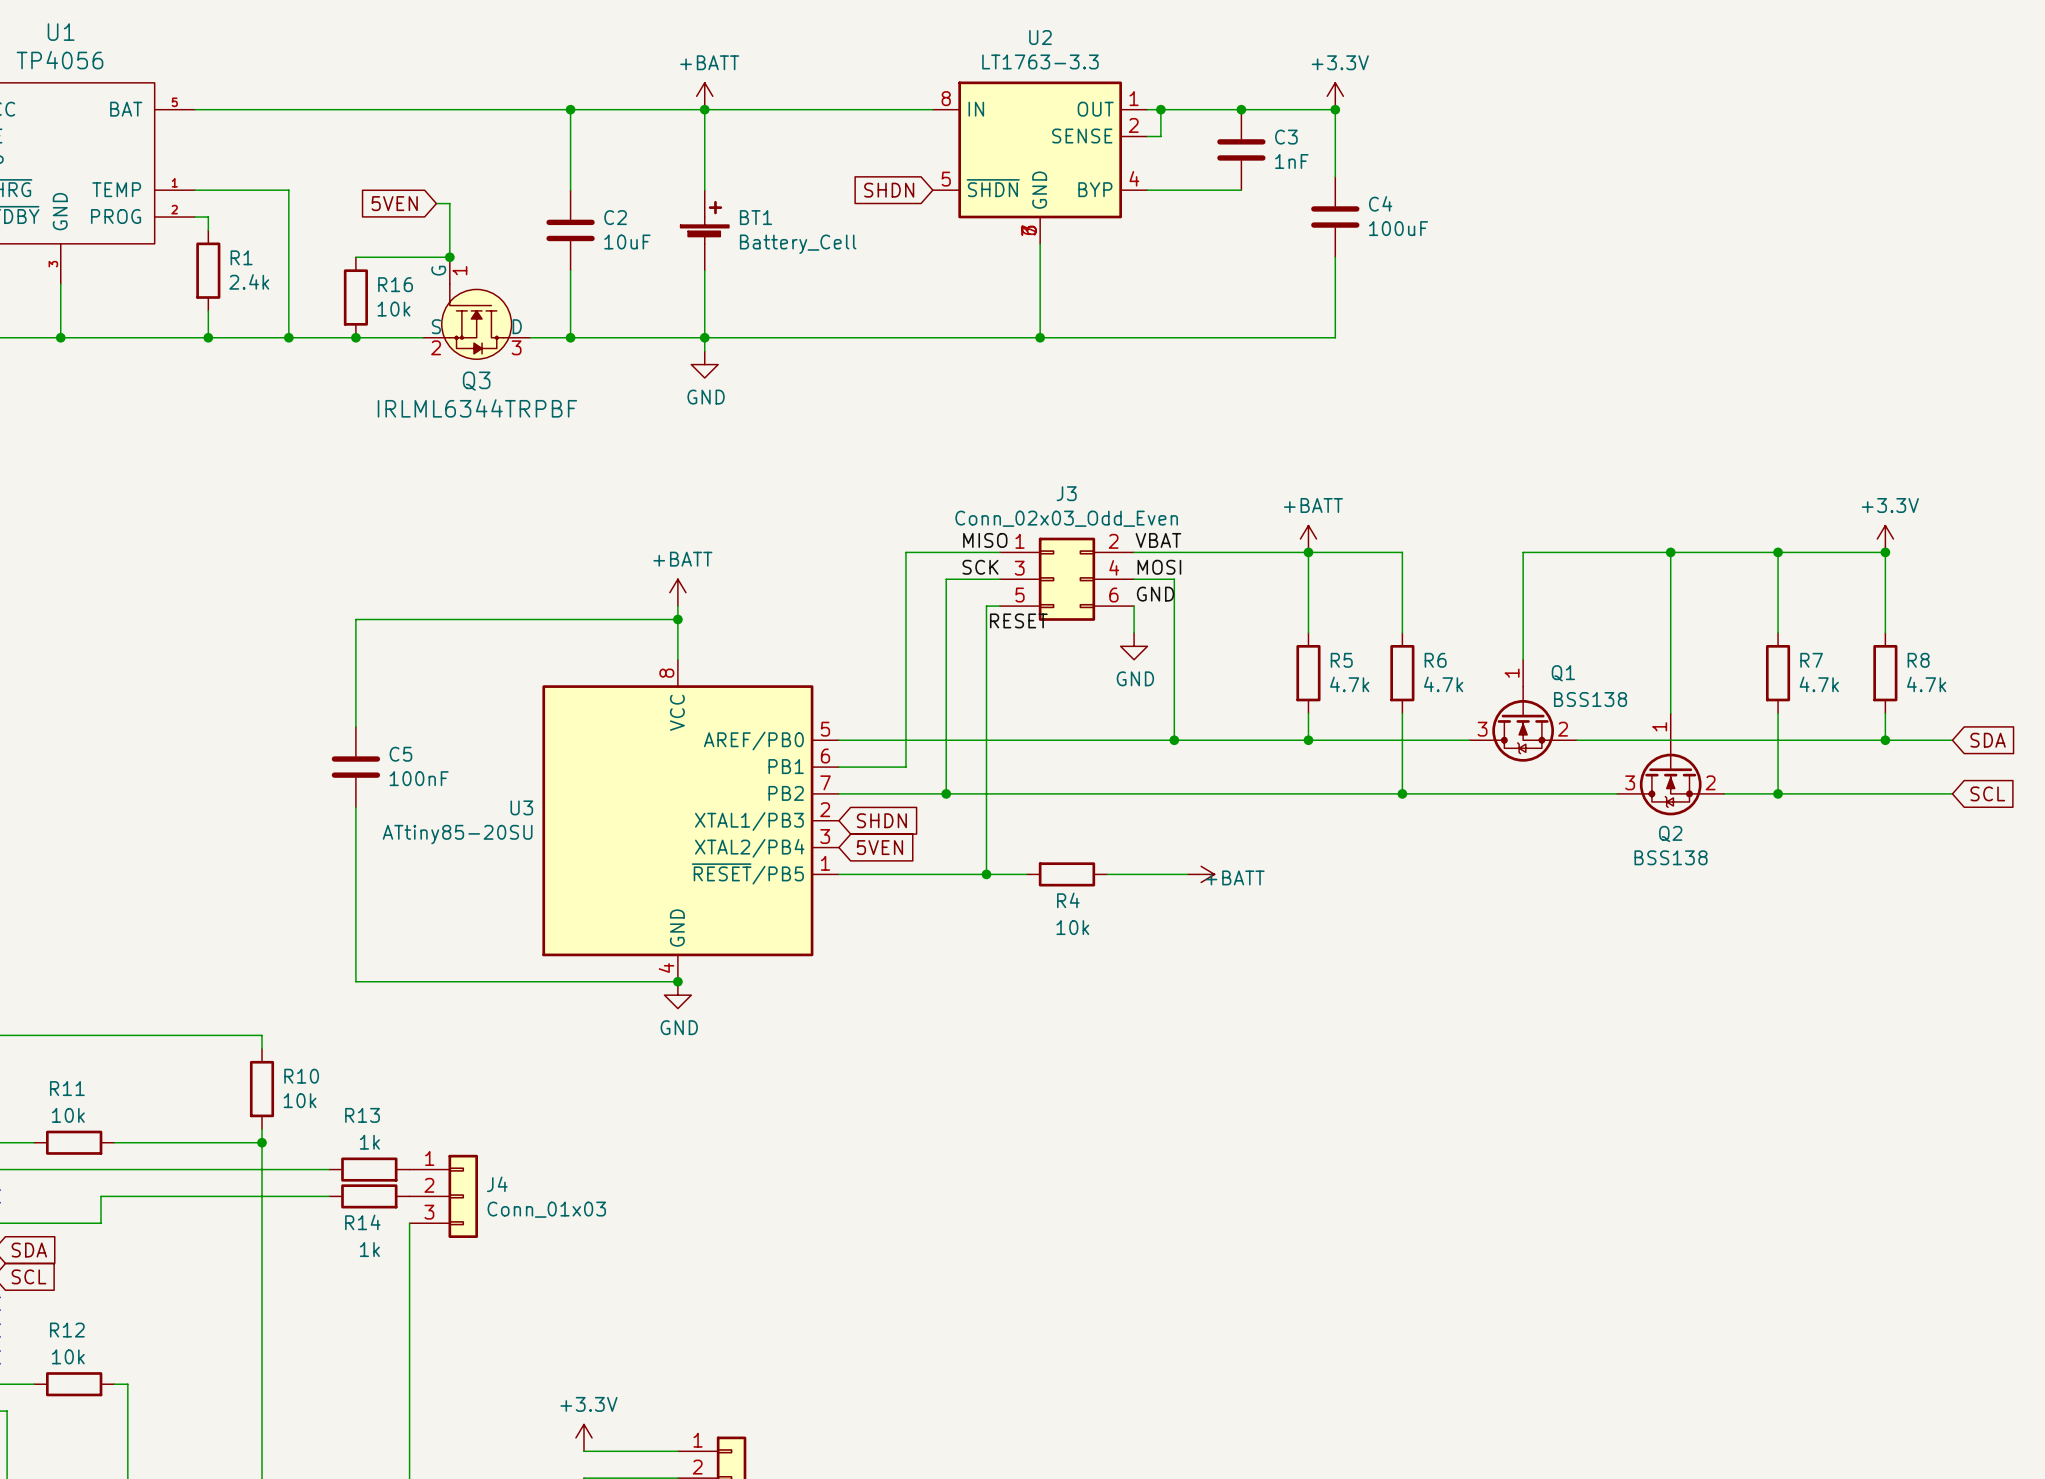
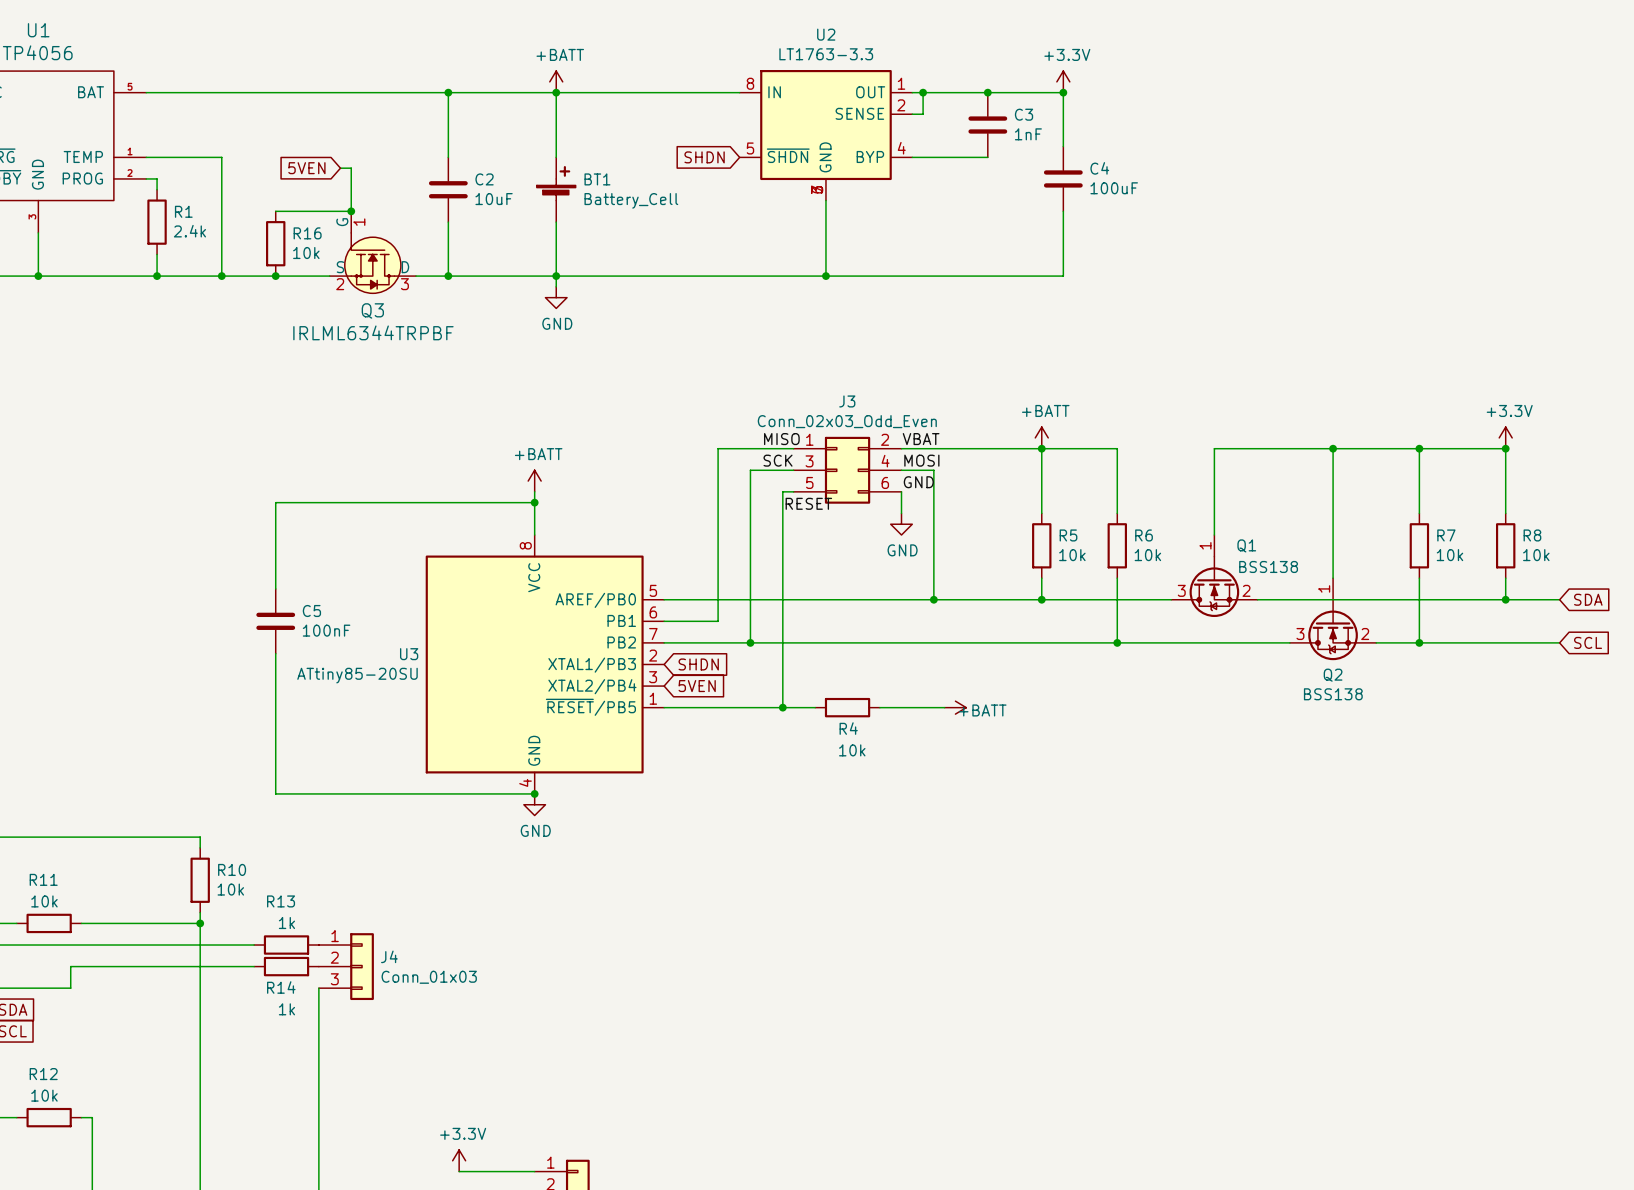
R5 value: 4.7k (1349, 684) -> 10k (1072, 555)
R6 value: 4.7k (1443, 684) -> 10k (1147, 555)
R7 value: 4.7k (1819, 684) -> 10k (1449, 555)
R8 value: 4.7k (1926, 684) -> 10k (1536, 555)

